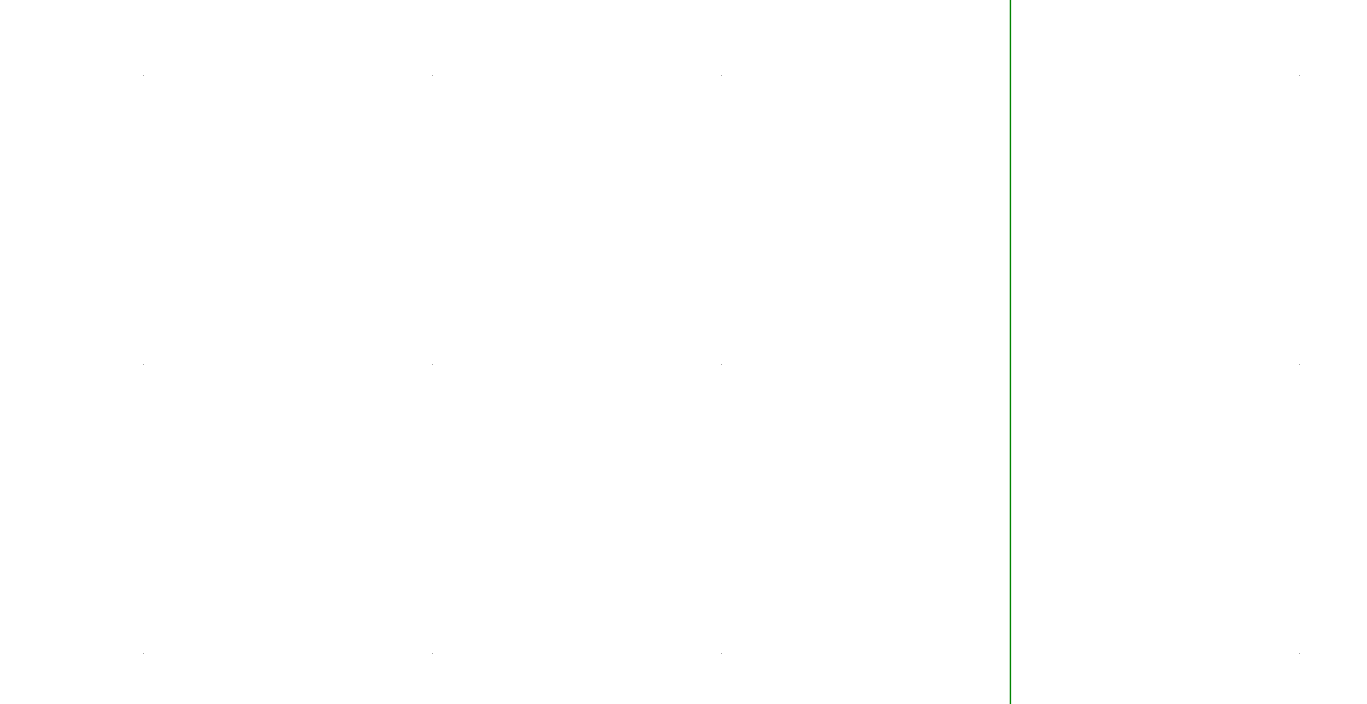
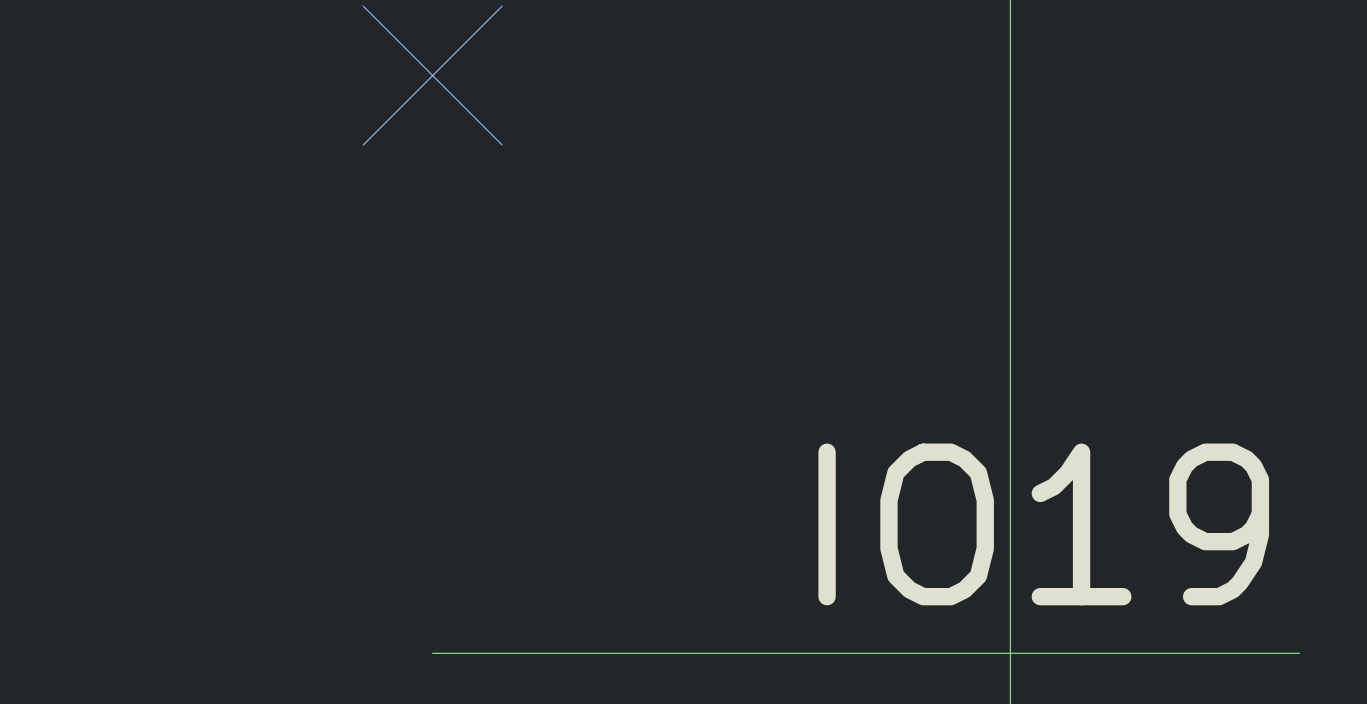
no-connect mark: none -> (432, 75)
label: none -> IO19 (1043, 524)
wire: none -> (432, 653) (1299, 653)

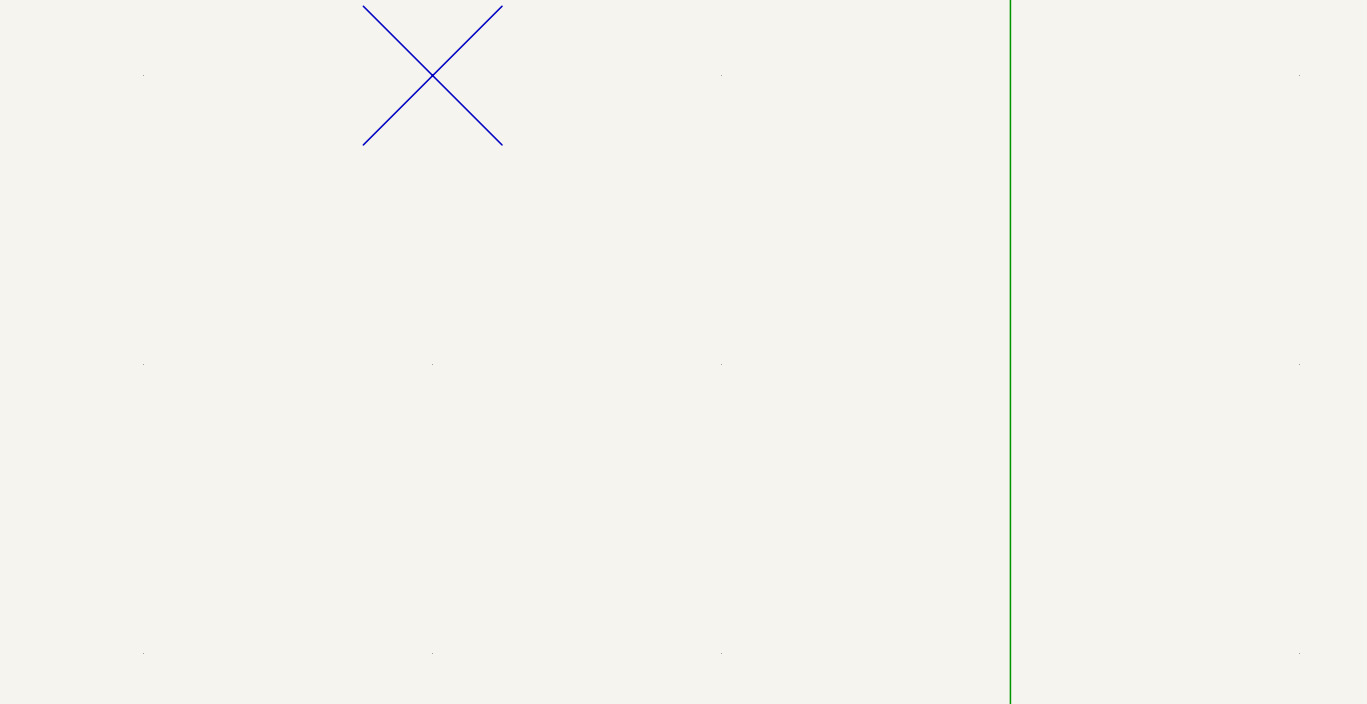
label: IO19 (1043, 524) -> none
wire: (432, 653) (1299, 653) -> none

